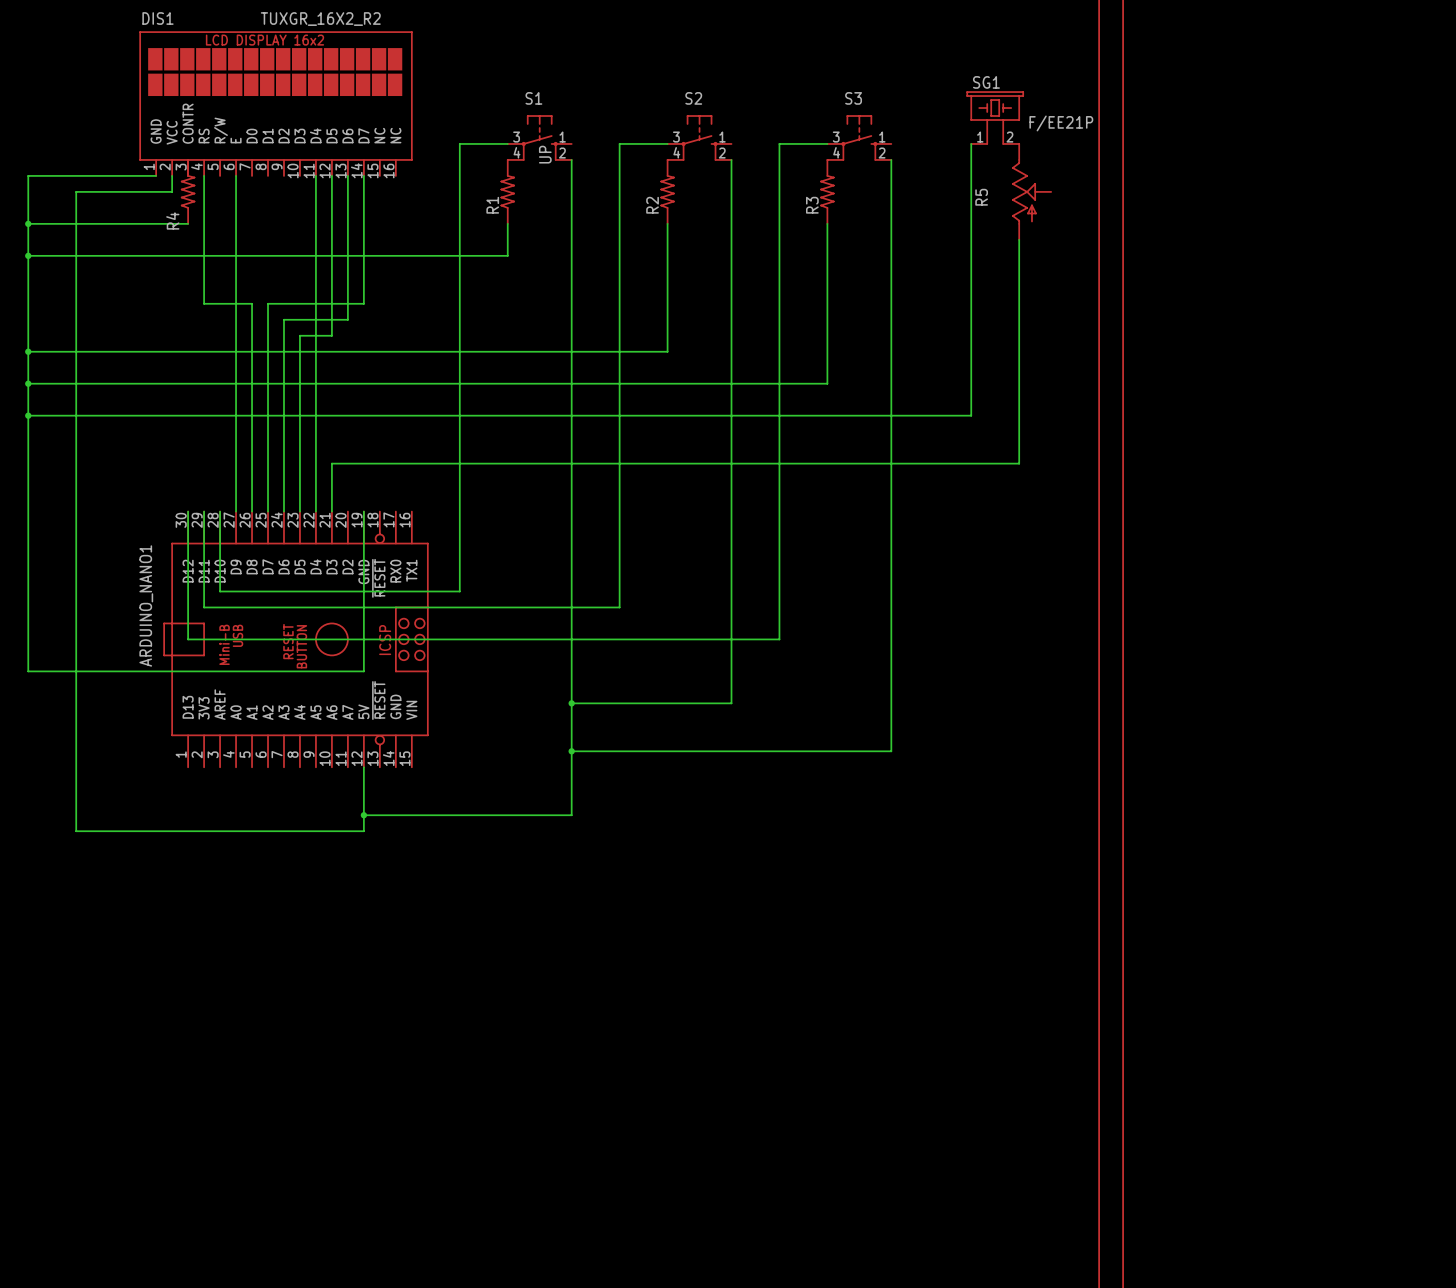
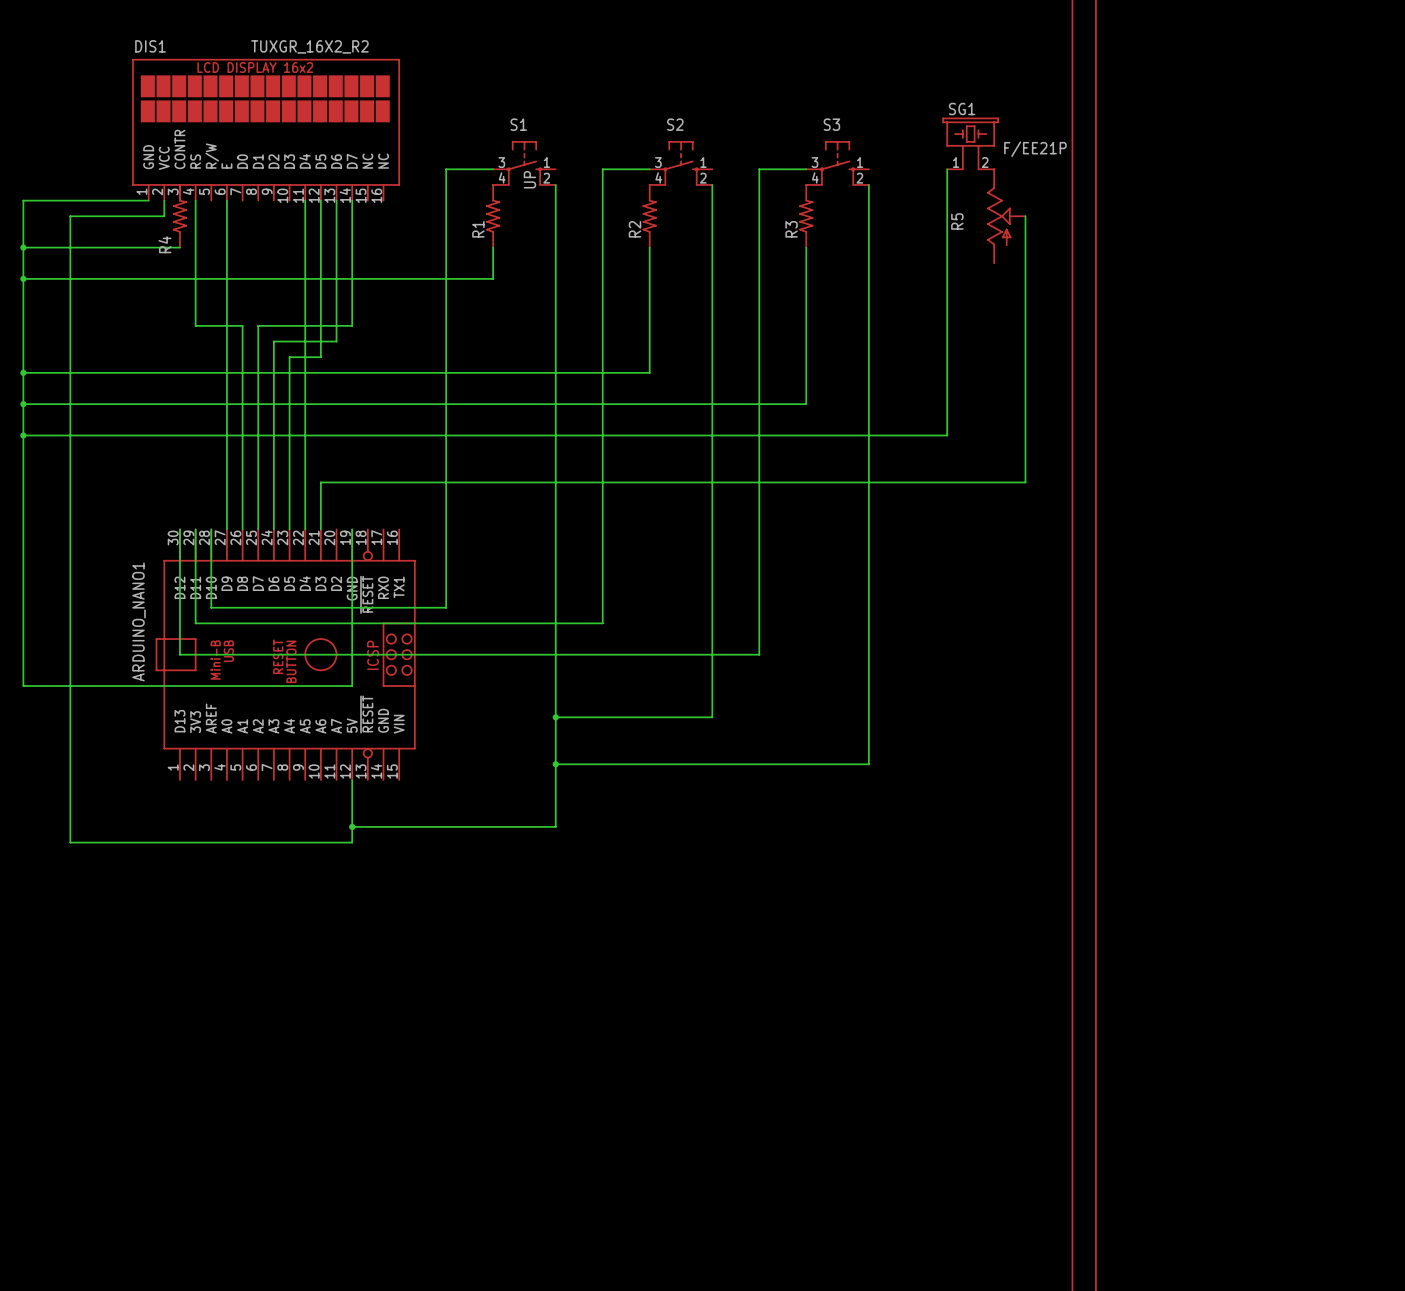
wire: (1019, 239) (1019, 463) -> (1025, 216) (1025, 482) (994, 482)

